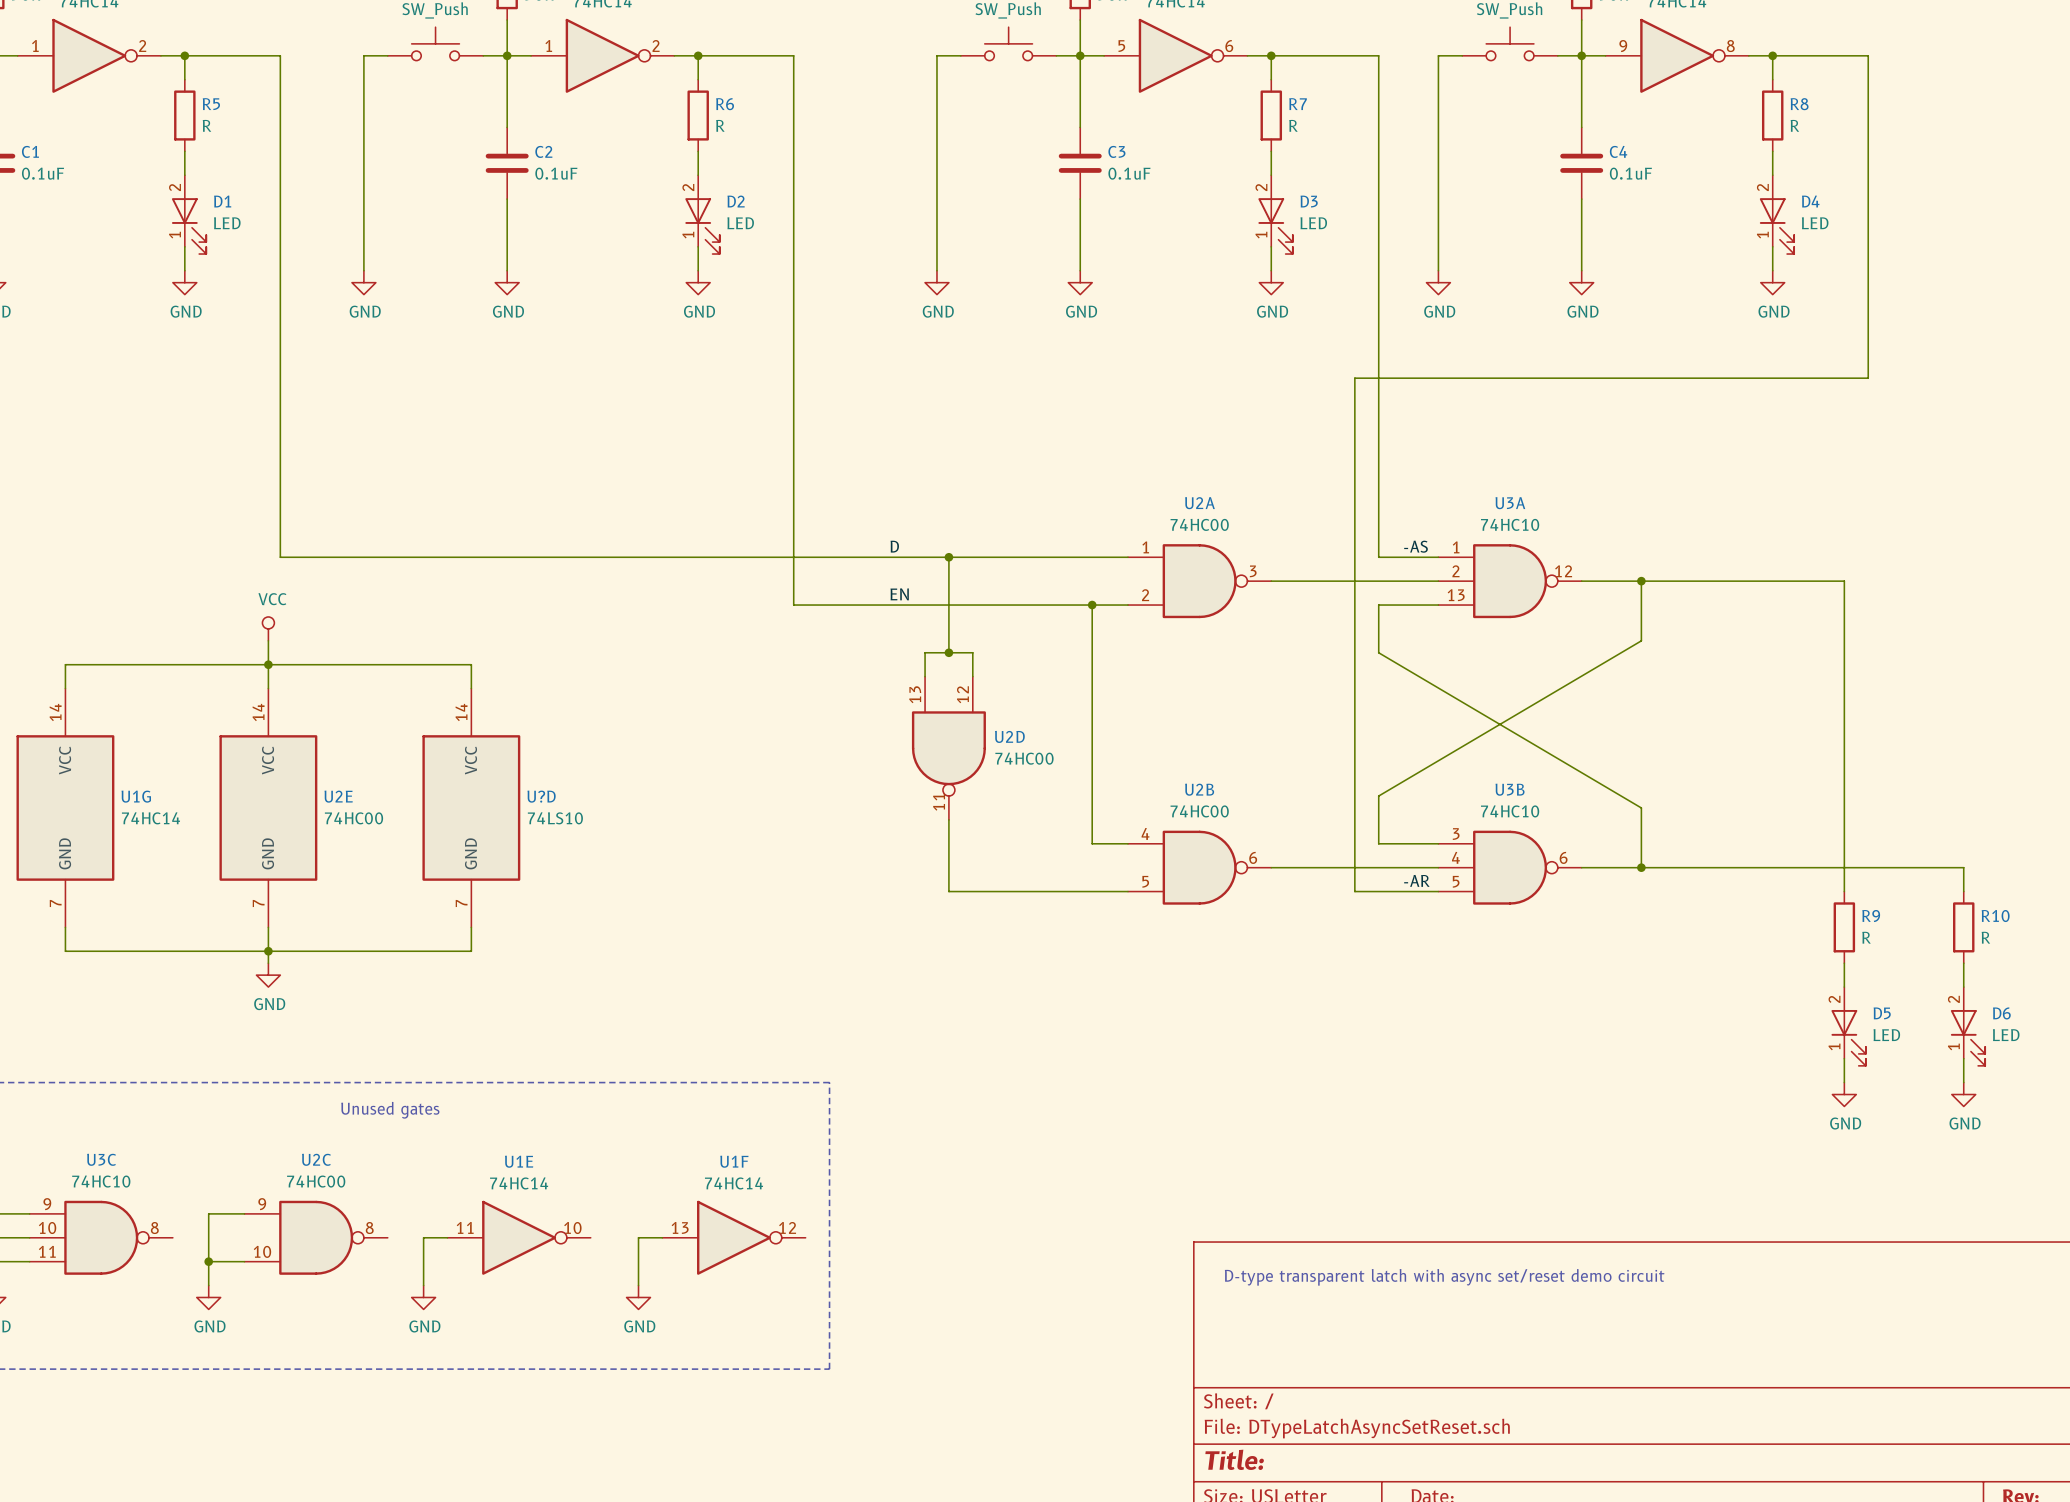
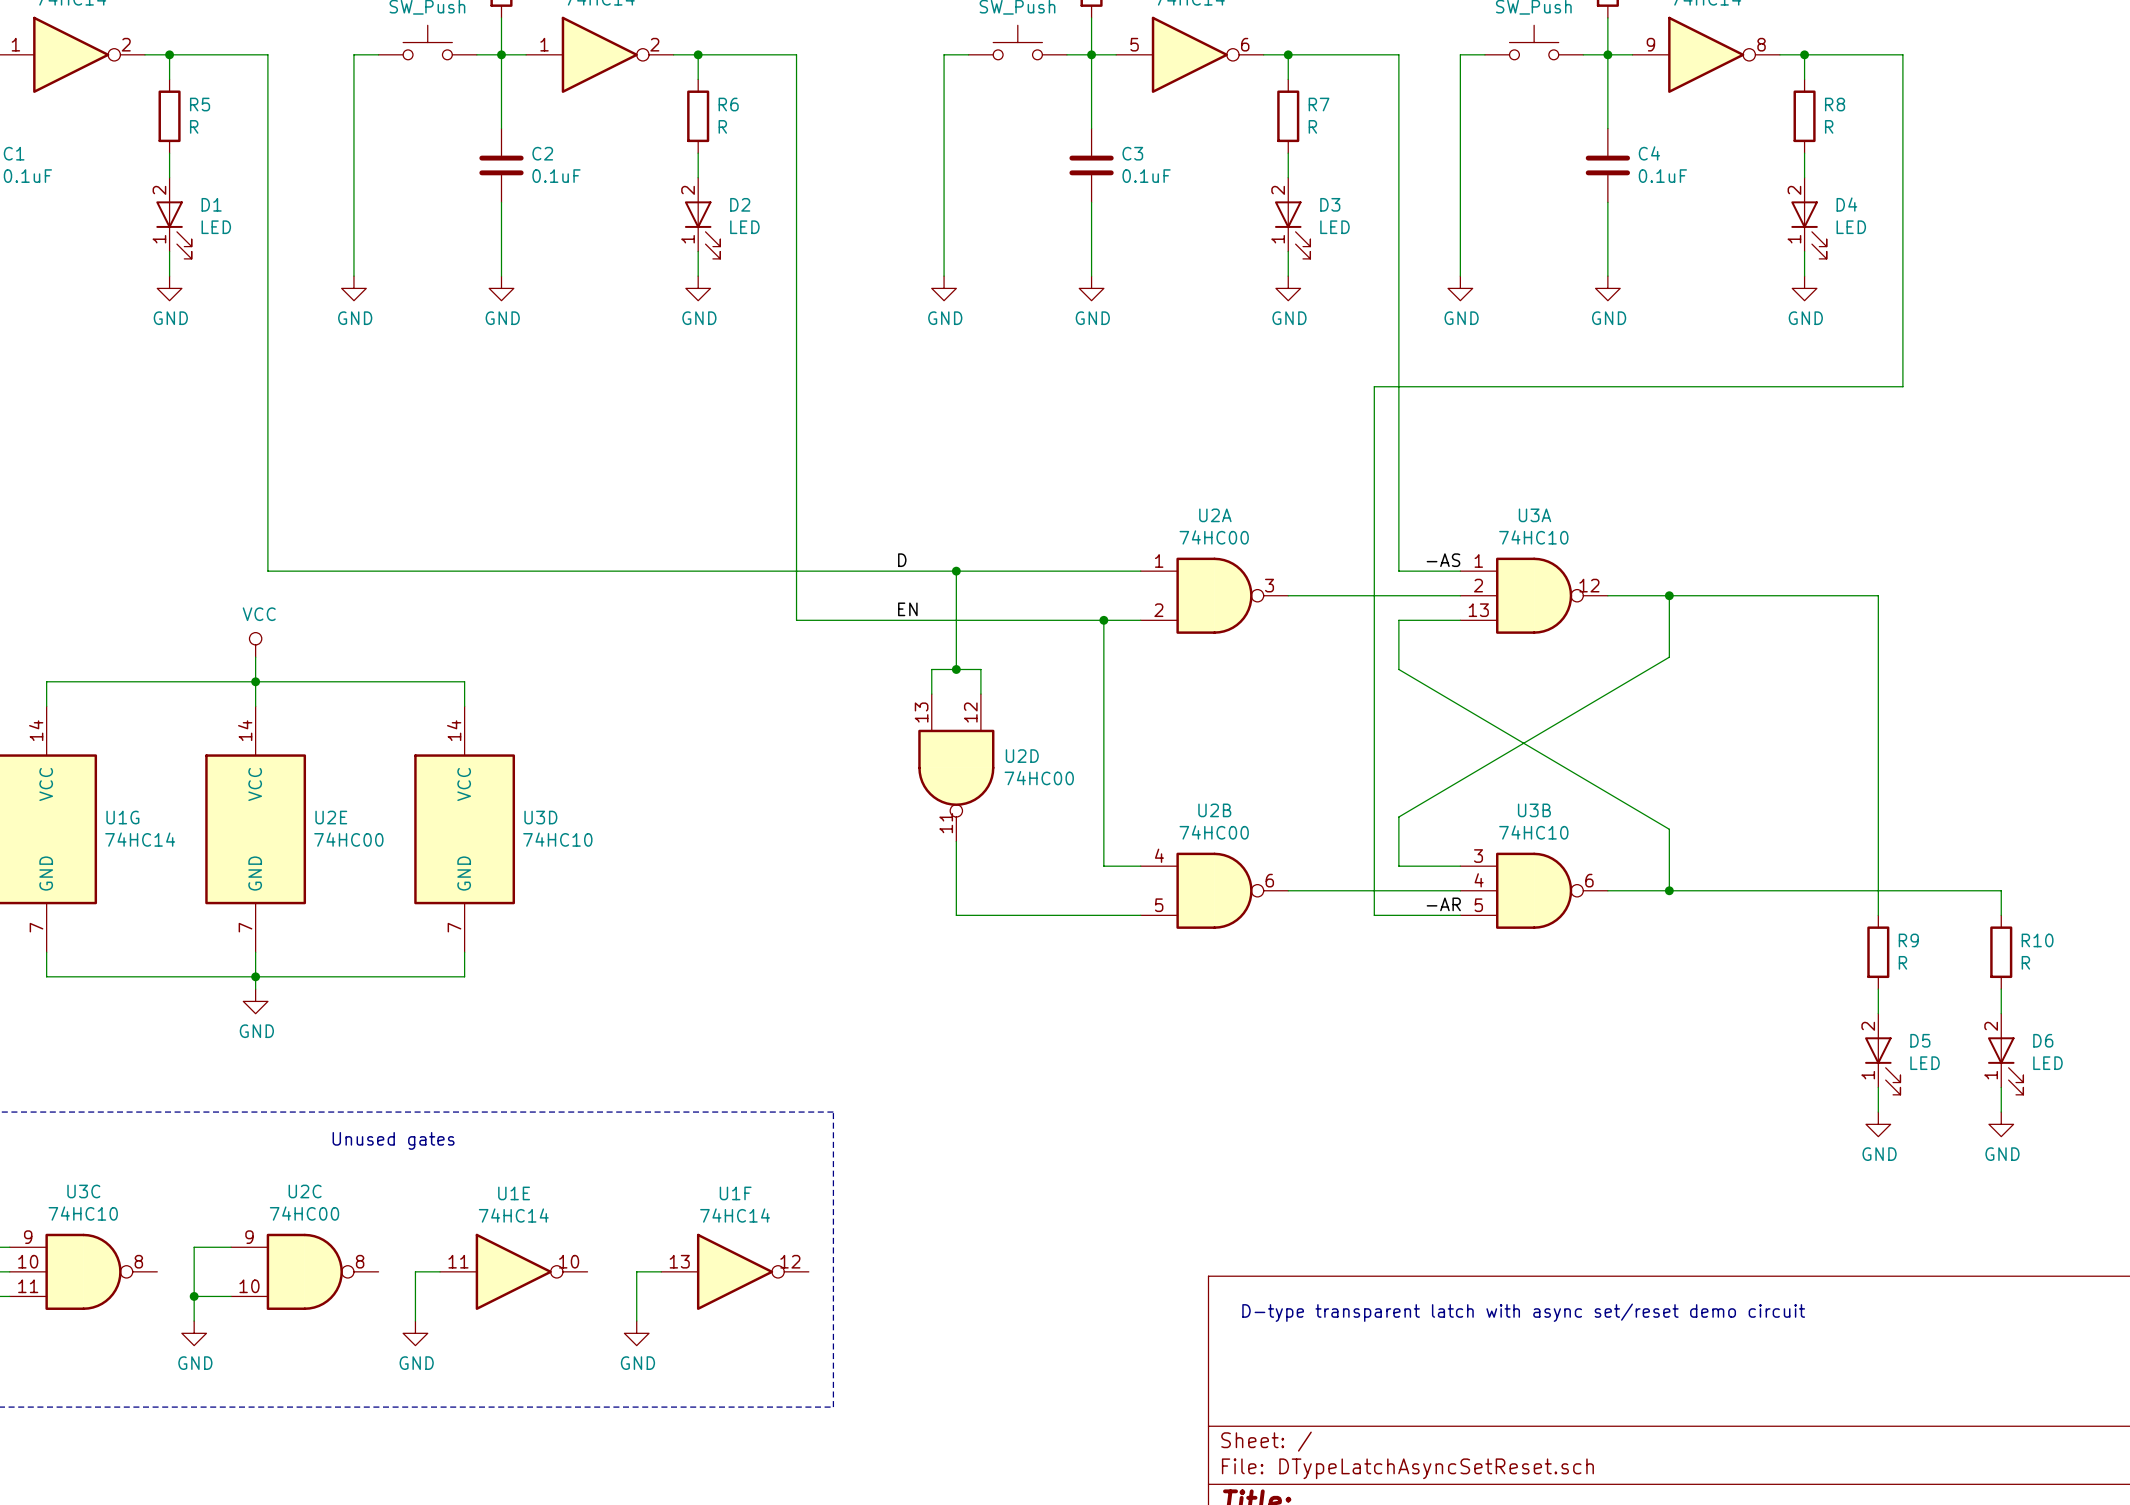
U?D name: U?D (541, 796) -> U3D (540, 817)
U?D value: 74LS10 (555, 818) -> 74HC10 (557, 839)

